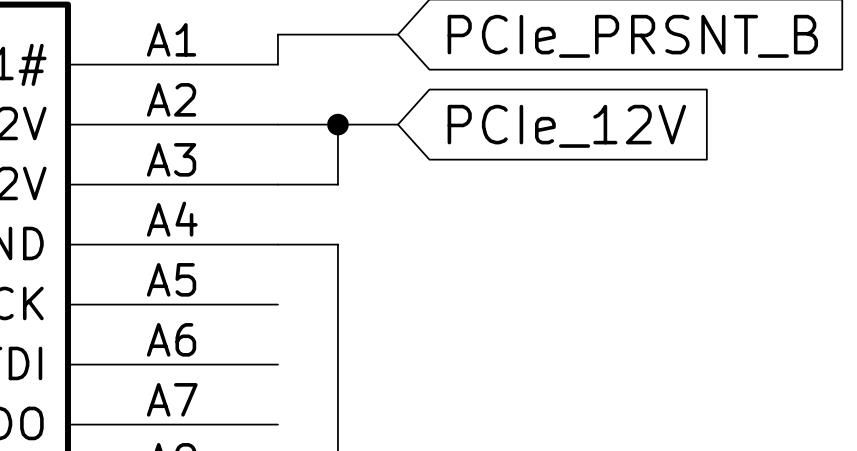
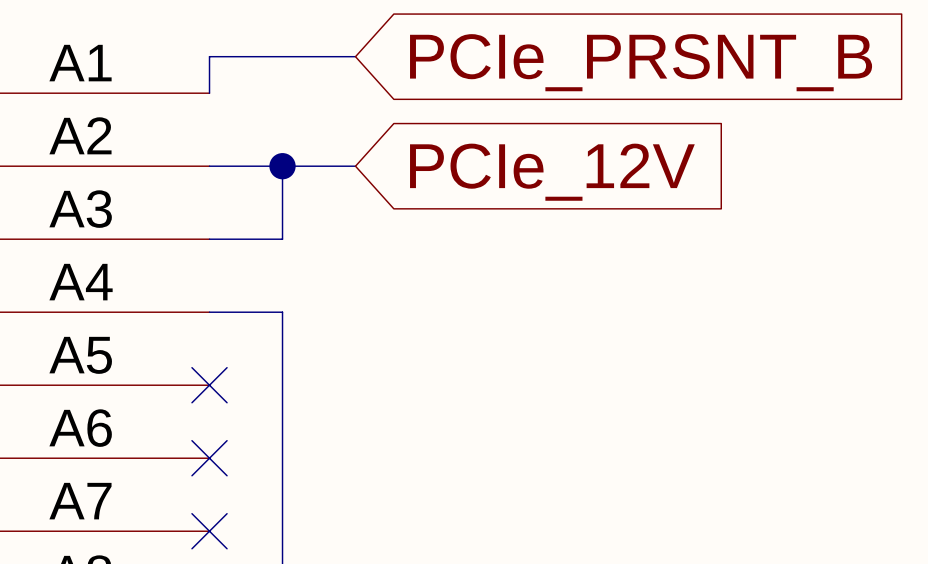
no-connect mark: none -> (209, 385)
no-connect mark: none -> (209, 458)
no-connect mark: none -> (209, 531)

